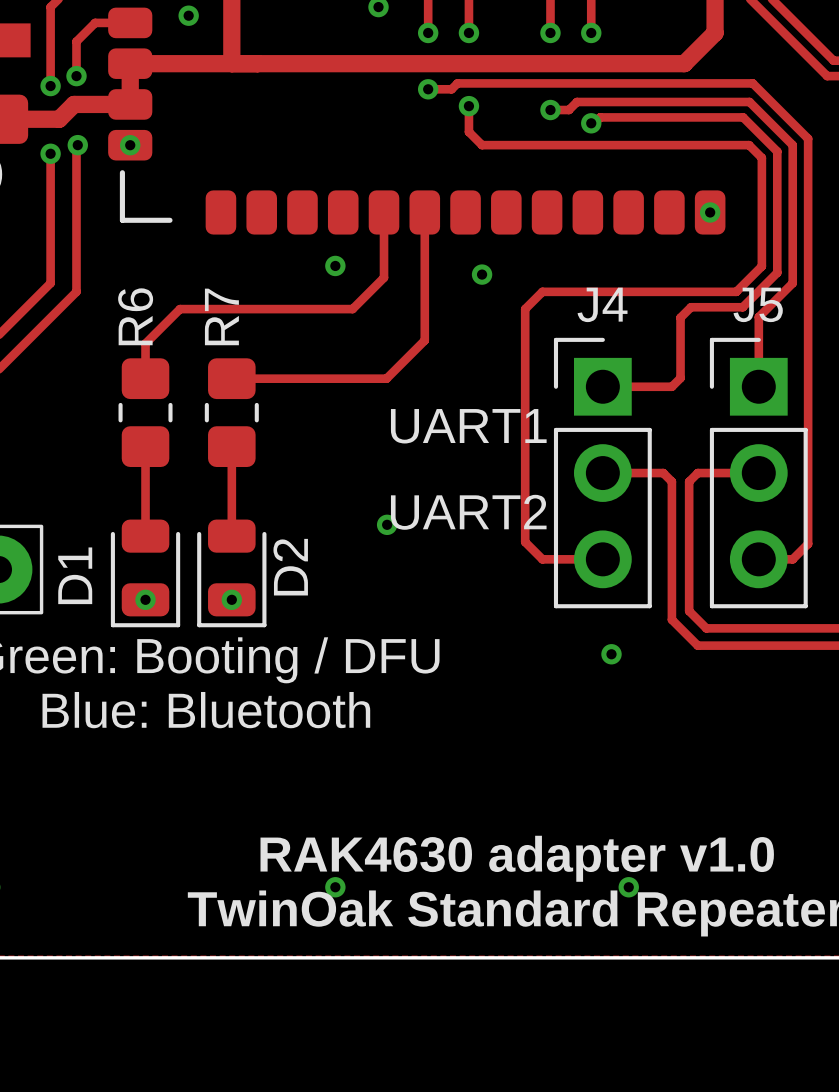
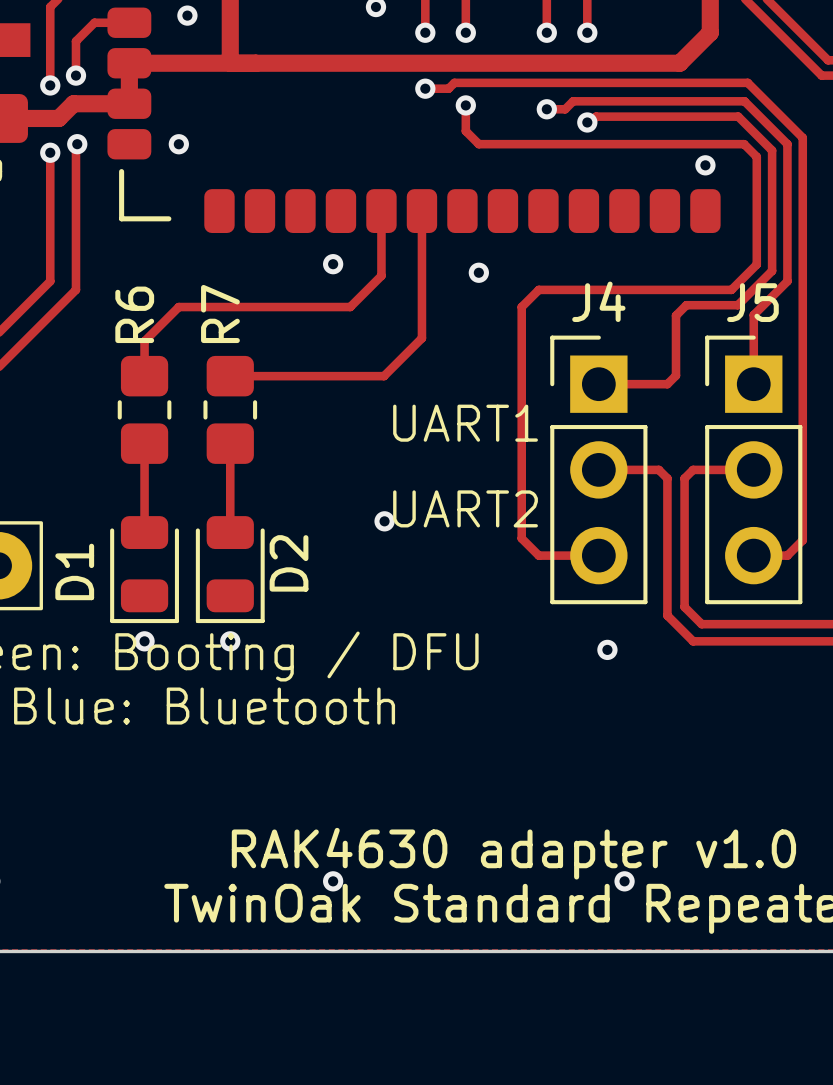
via position: (130, 145) -> (178, 144)
via position: (710, 212) -> (705, 165)
via position: (145, 599) -> (144, 641)
via position: (231, 599) -> (230, 641)

